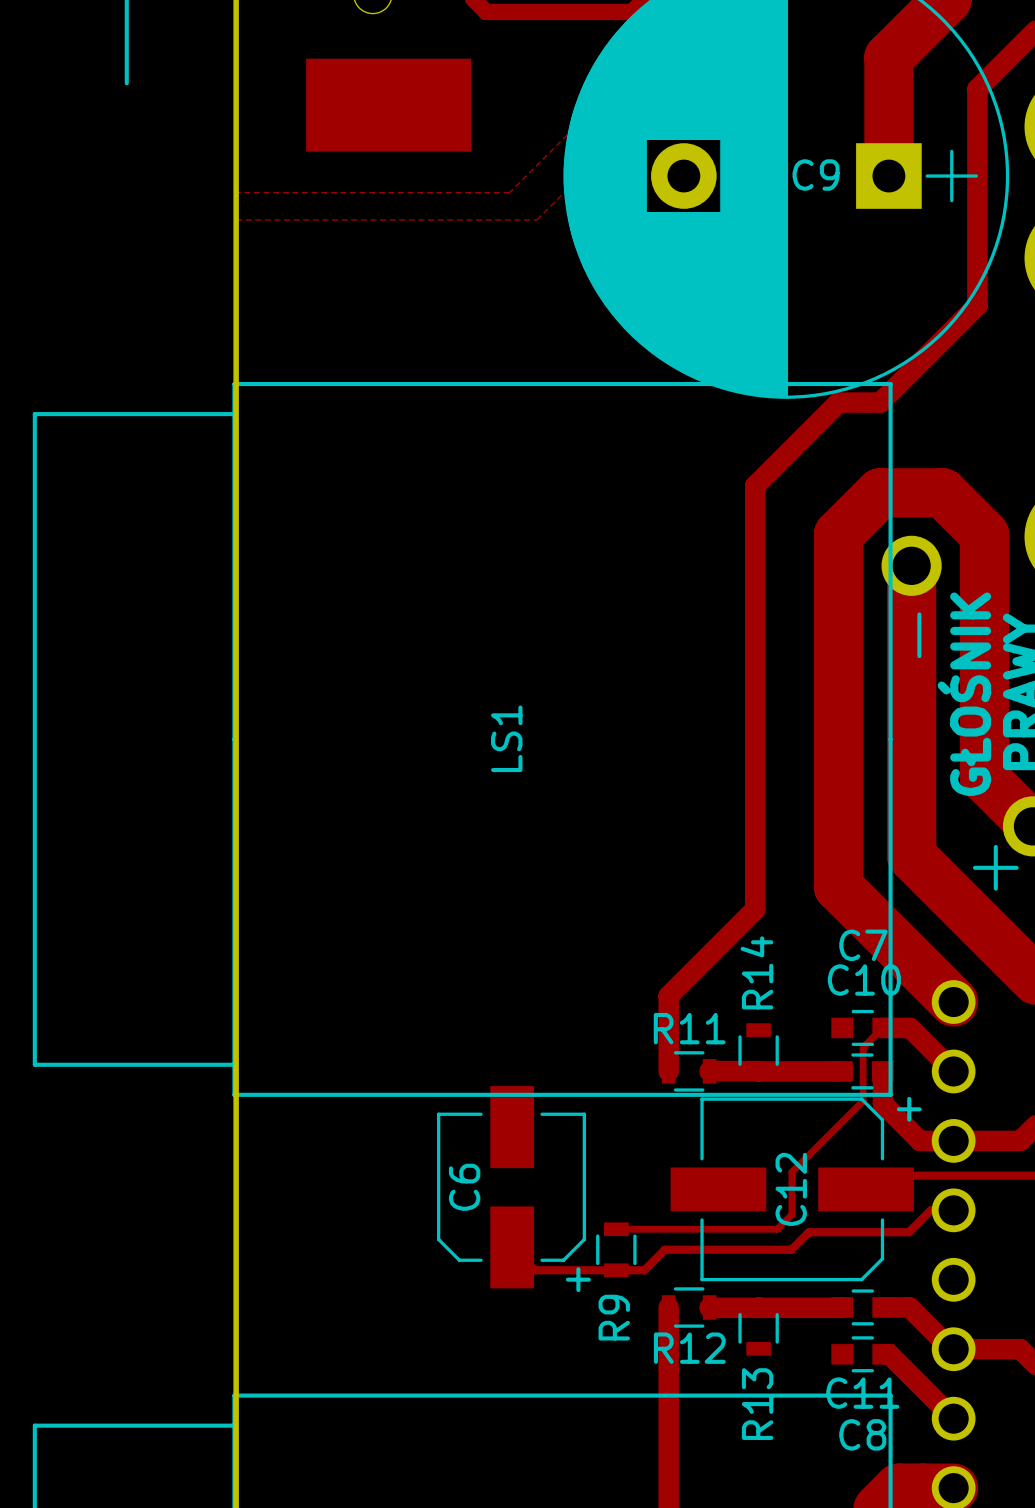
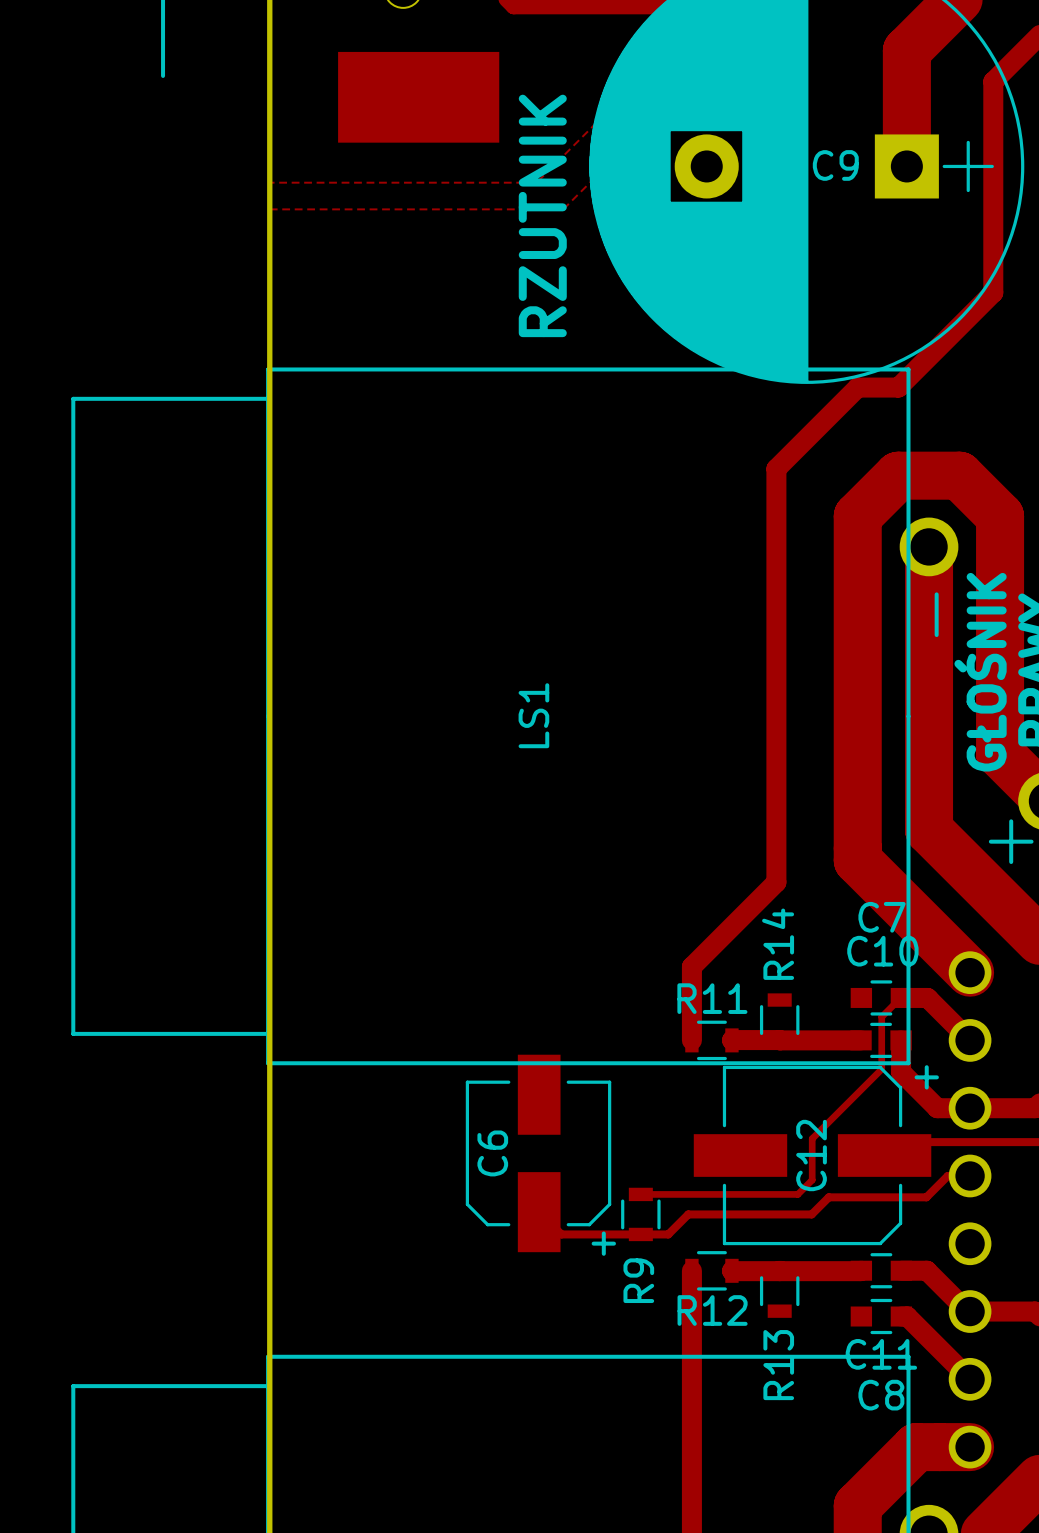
text: none -> RZUTNIK (542, 215)

